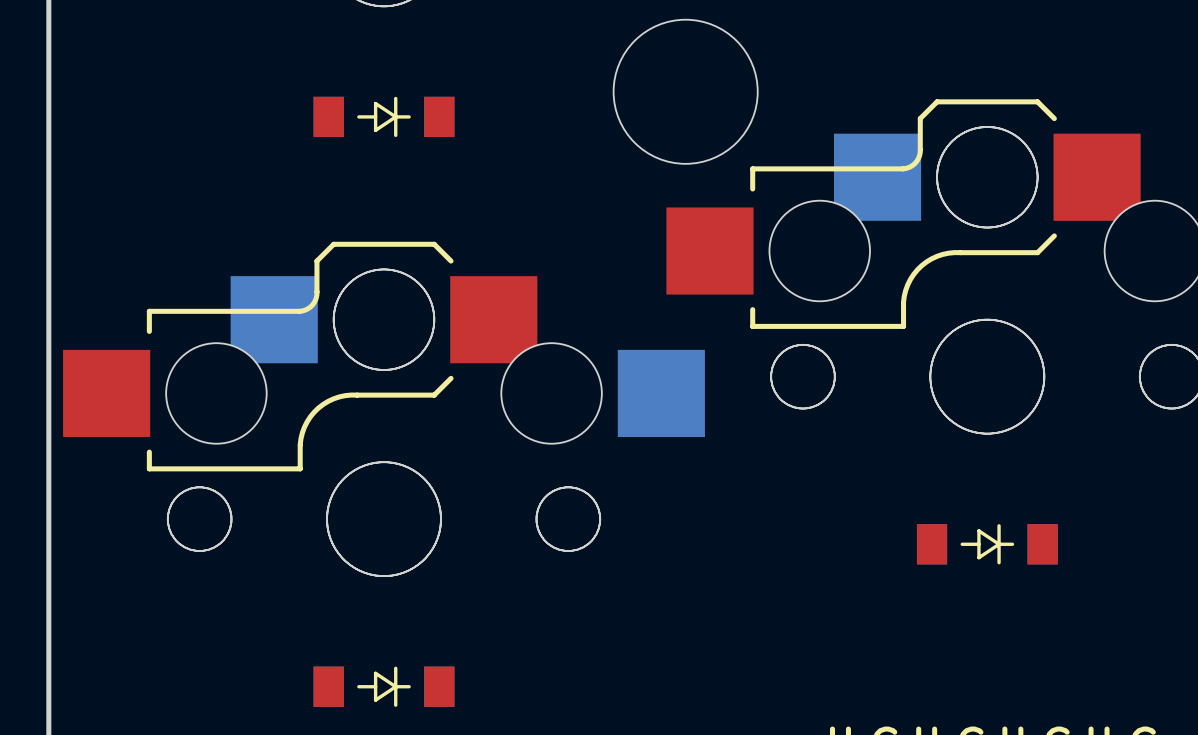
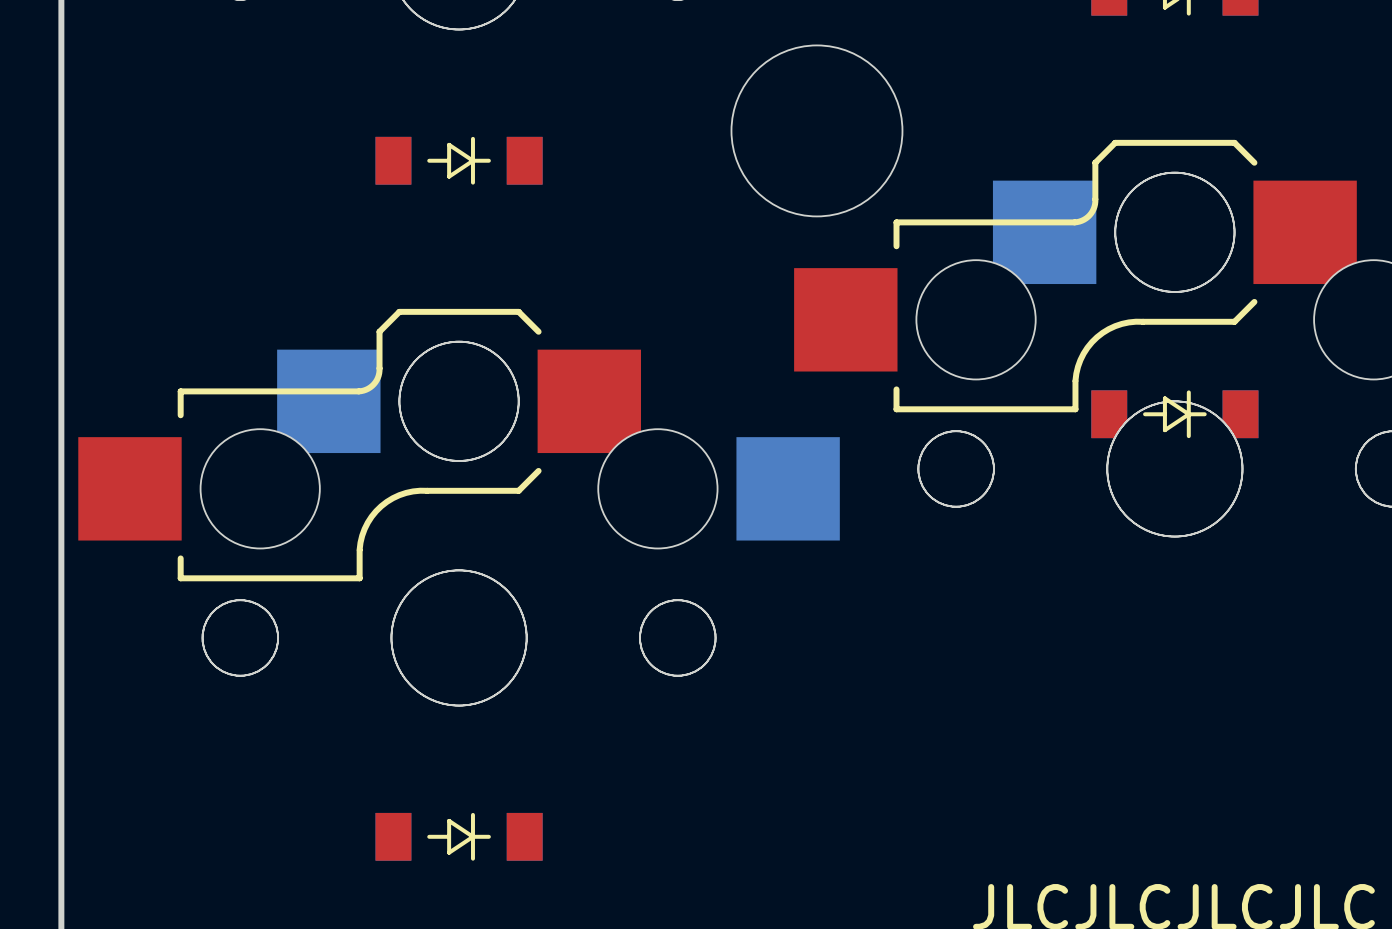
part position: (987, 544) -> (1174, 414)

